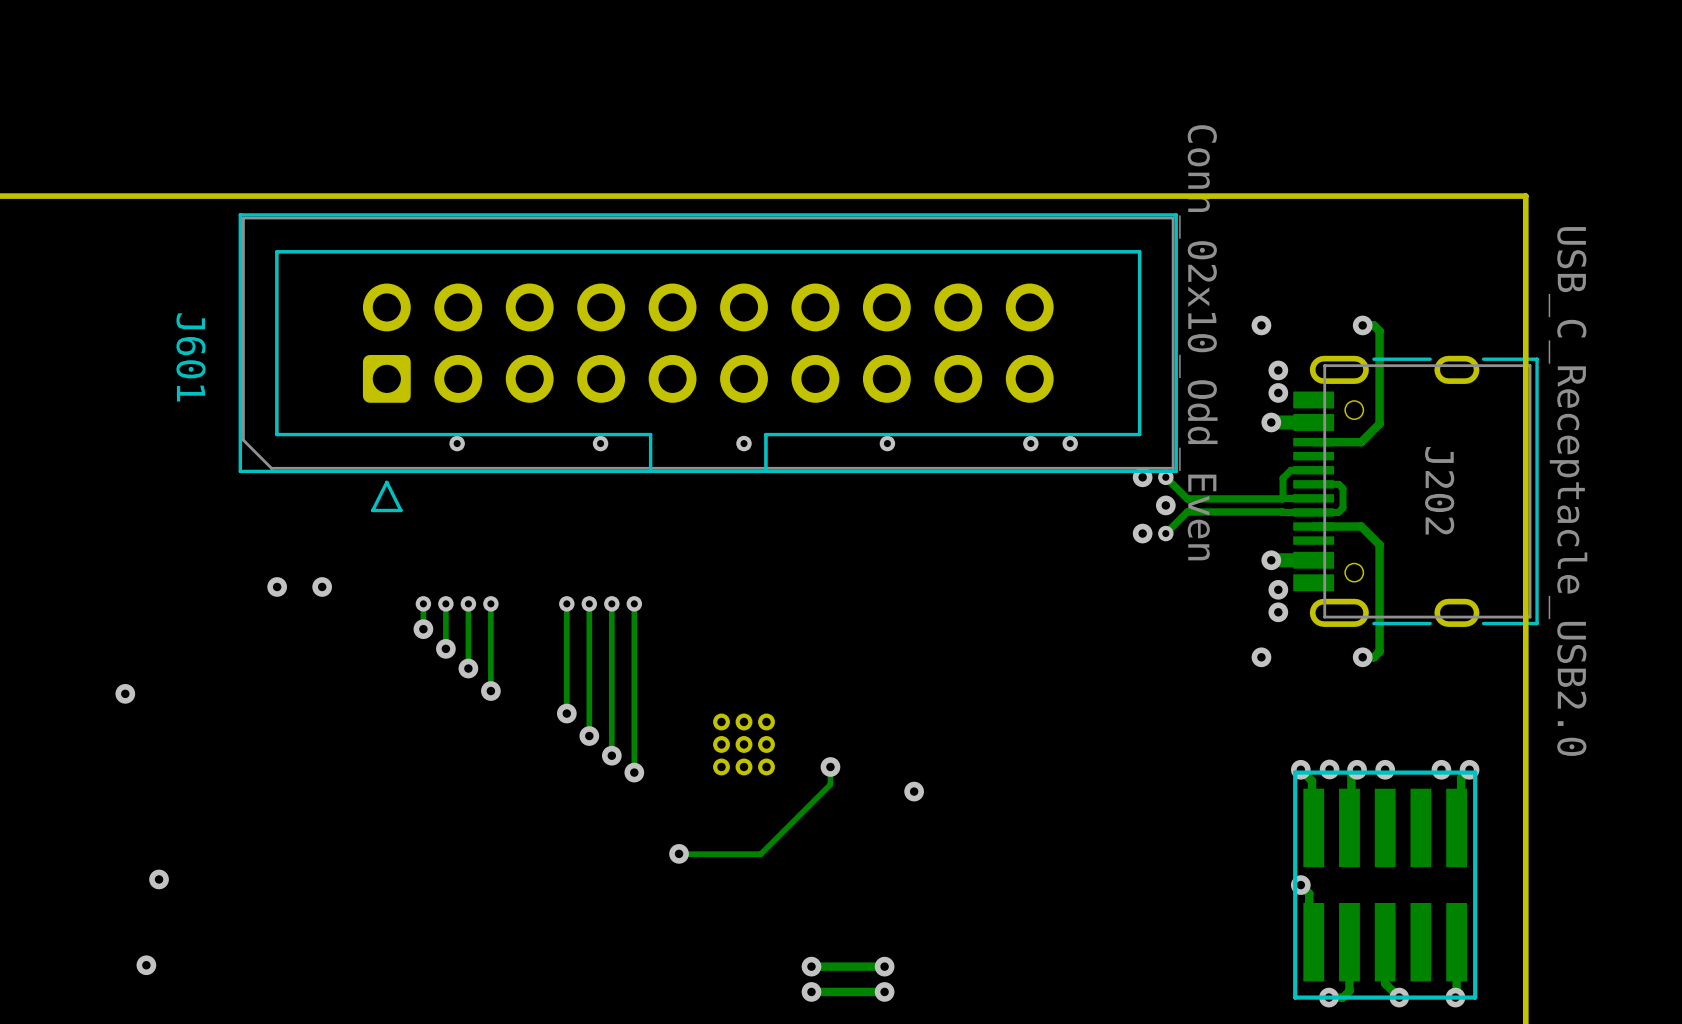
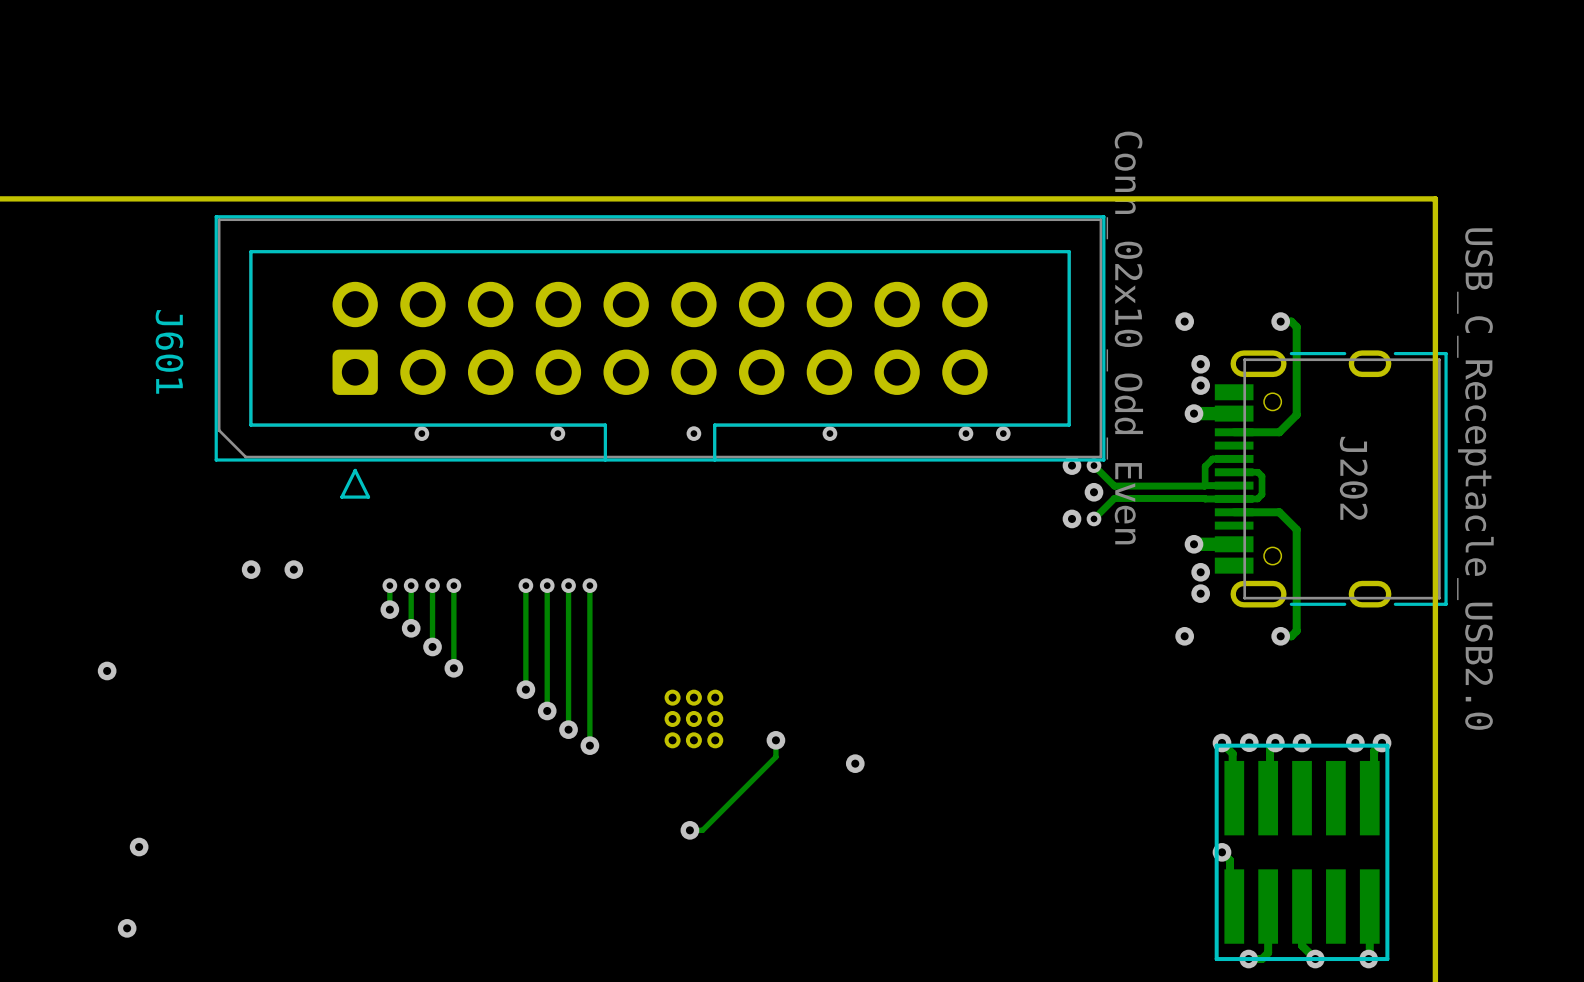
via position: (679, 853) -> (689, 830)
track: (760, 854) (679, 854) -> (709, 823) (702, 830) (689, 830)
via: (811, 966) -> none
track: (884, 966) (811, 966) -> none
via: (884, 966) -> none
via: (811, 991) -> none
track: (884, 991) (811, 991) -> none
via: (884, 991) -> none

